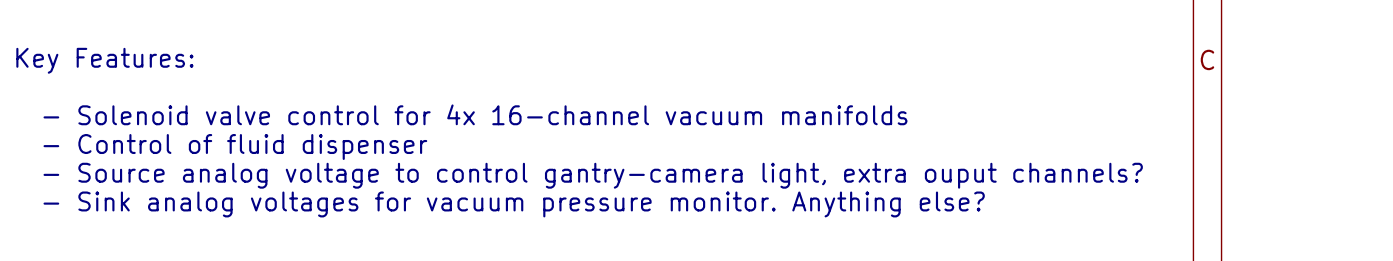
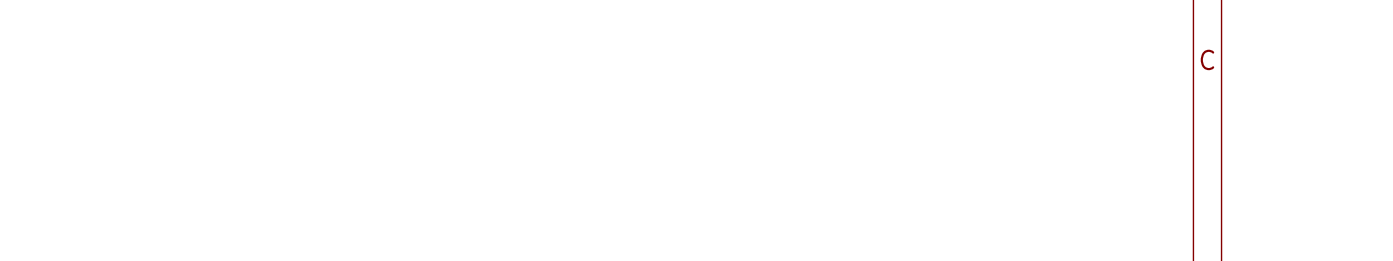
text: Key Features: (104, 60) -> none
text: - Solenoid valve control for 4x 16-channel vacuum manifolds (475, 114) -> none
text: - Control of fluid dispenser (235, 146) -> none
text: - Source analog voltage to control gantry-camera light, extra ouput channels? (593, 175) -> none
text: - Sink analog voltages for vacuum pressure monitor. Anything else? (514, 204) -> none

